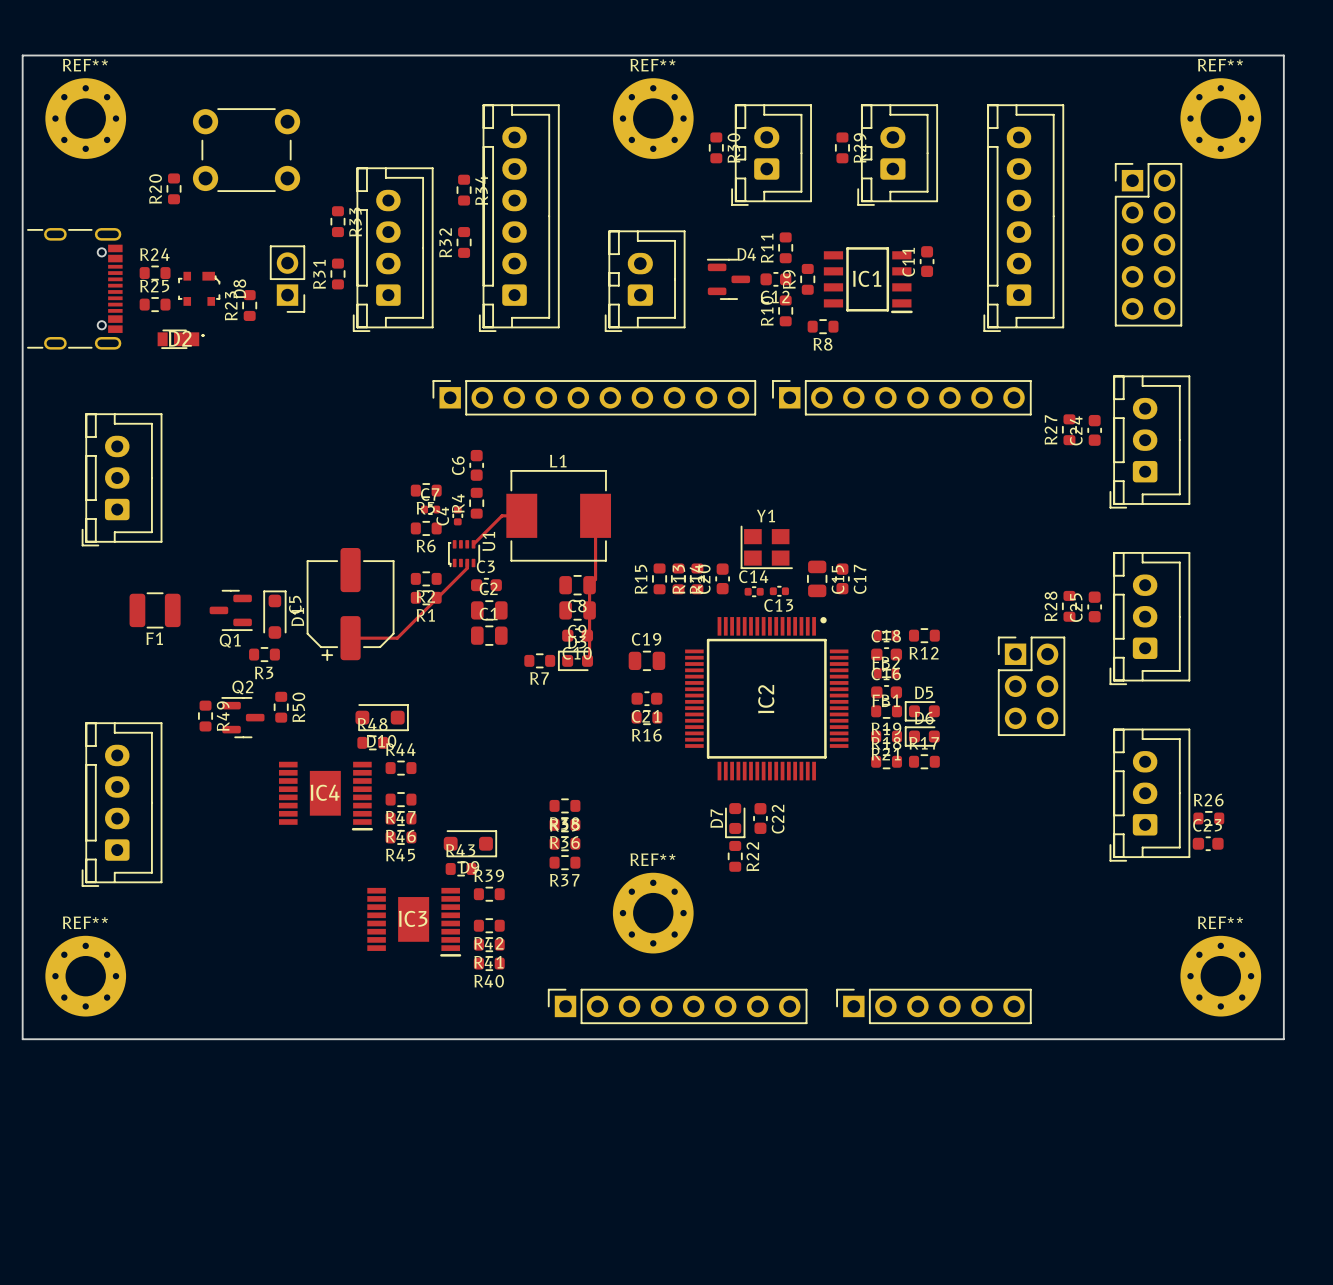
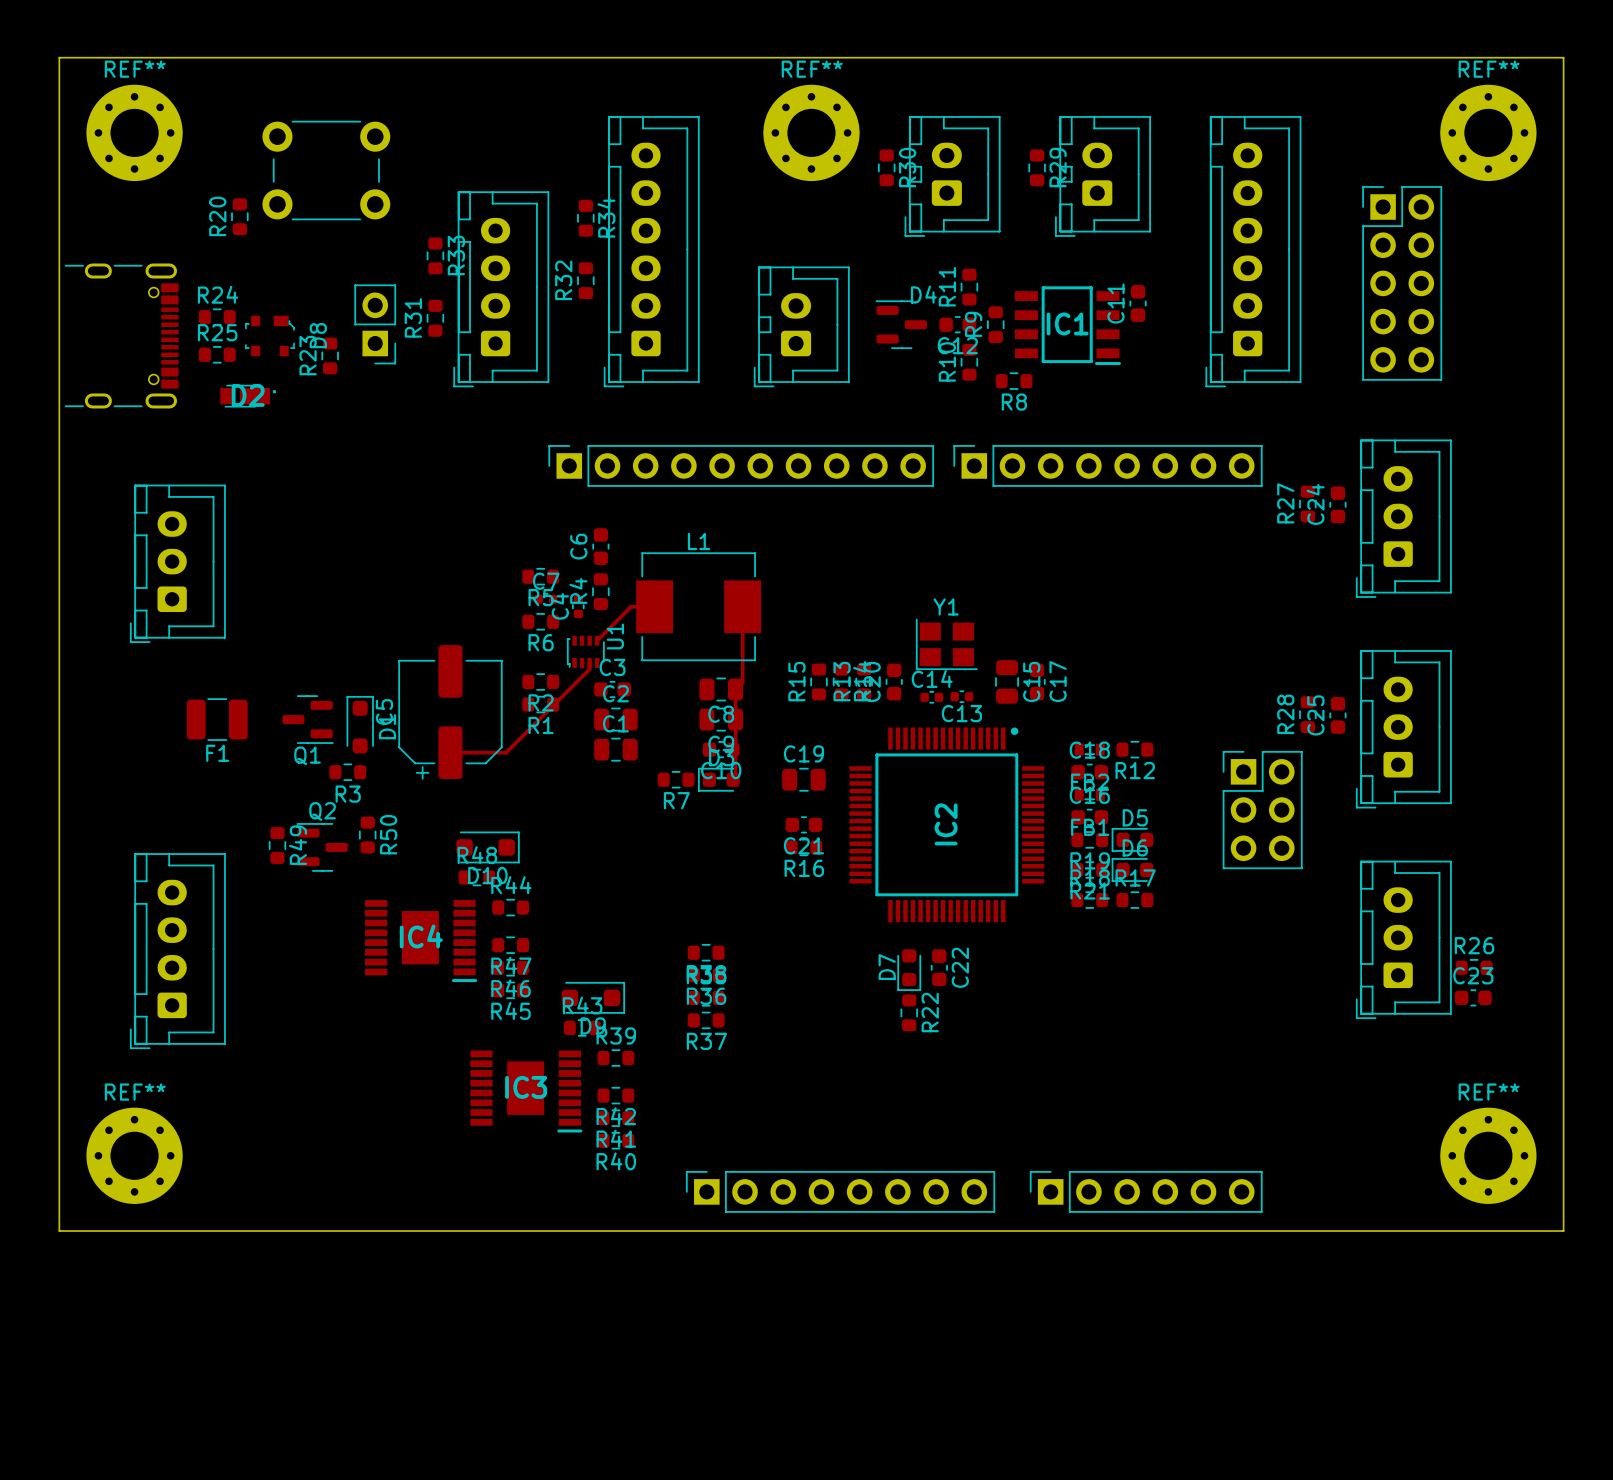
REF**: (653, 913) -> none

